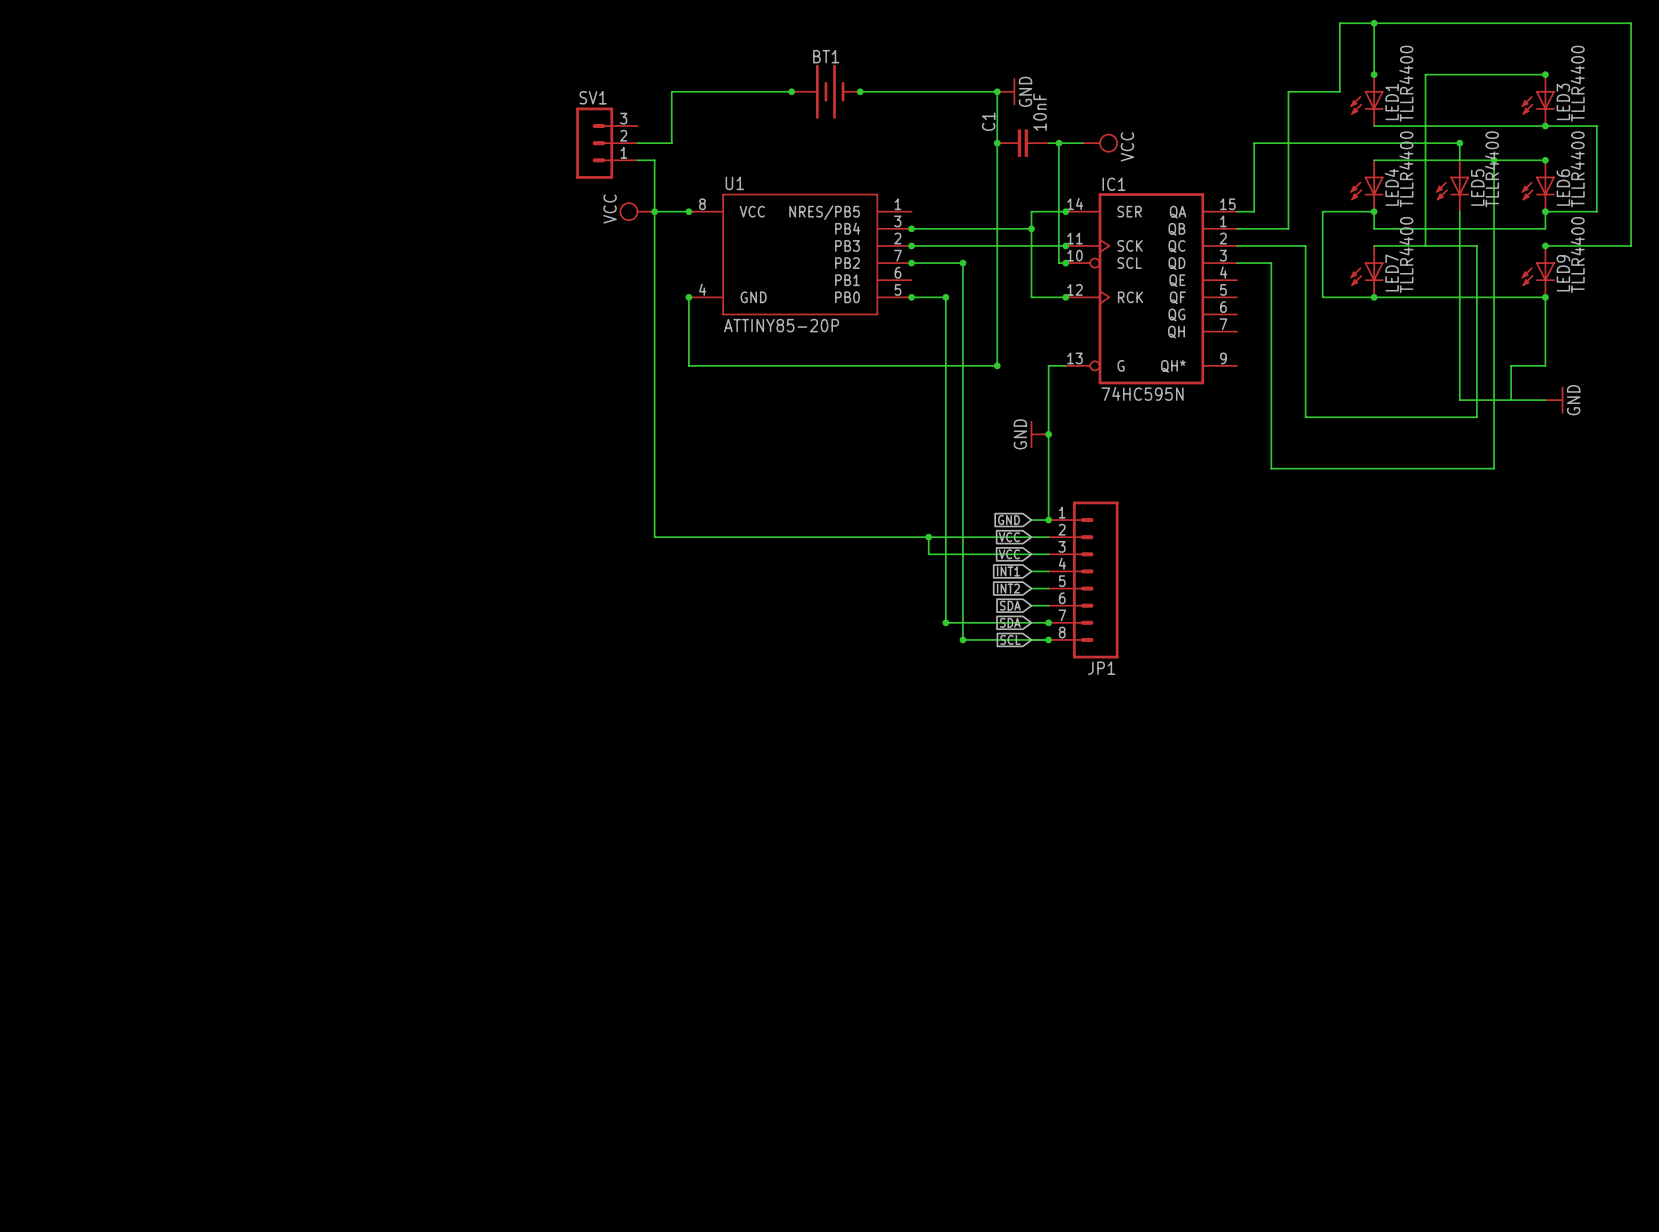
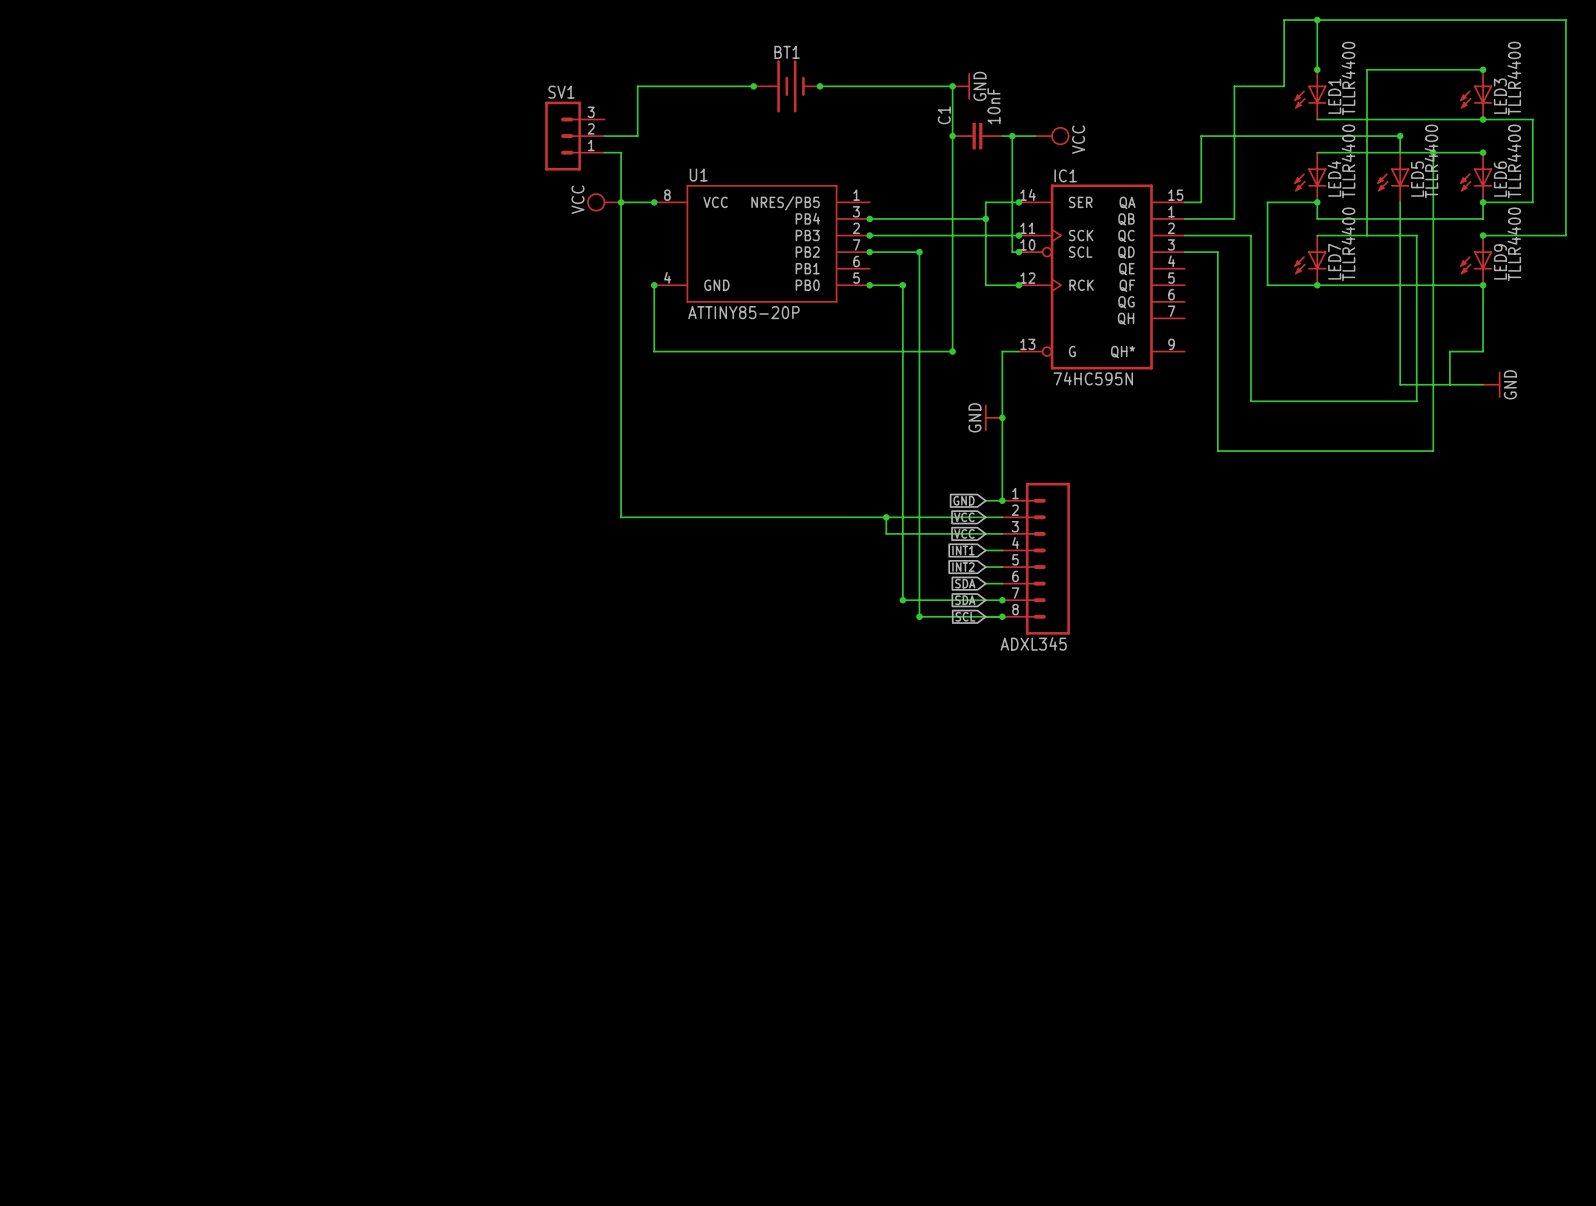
JP1 name: JP1 (1101, 668) -> ADXL345 (1033, 643)

